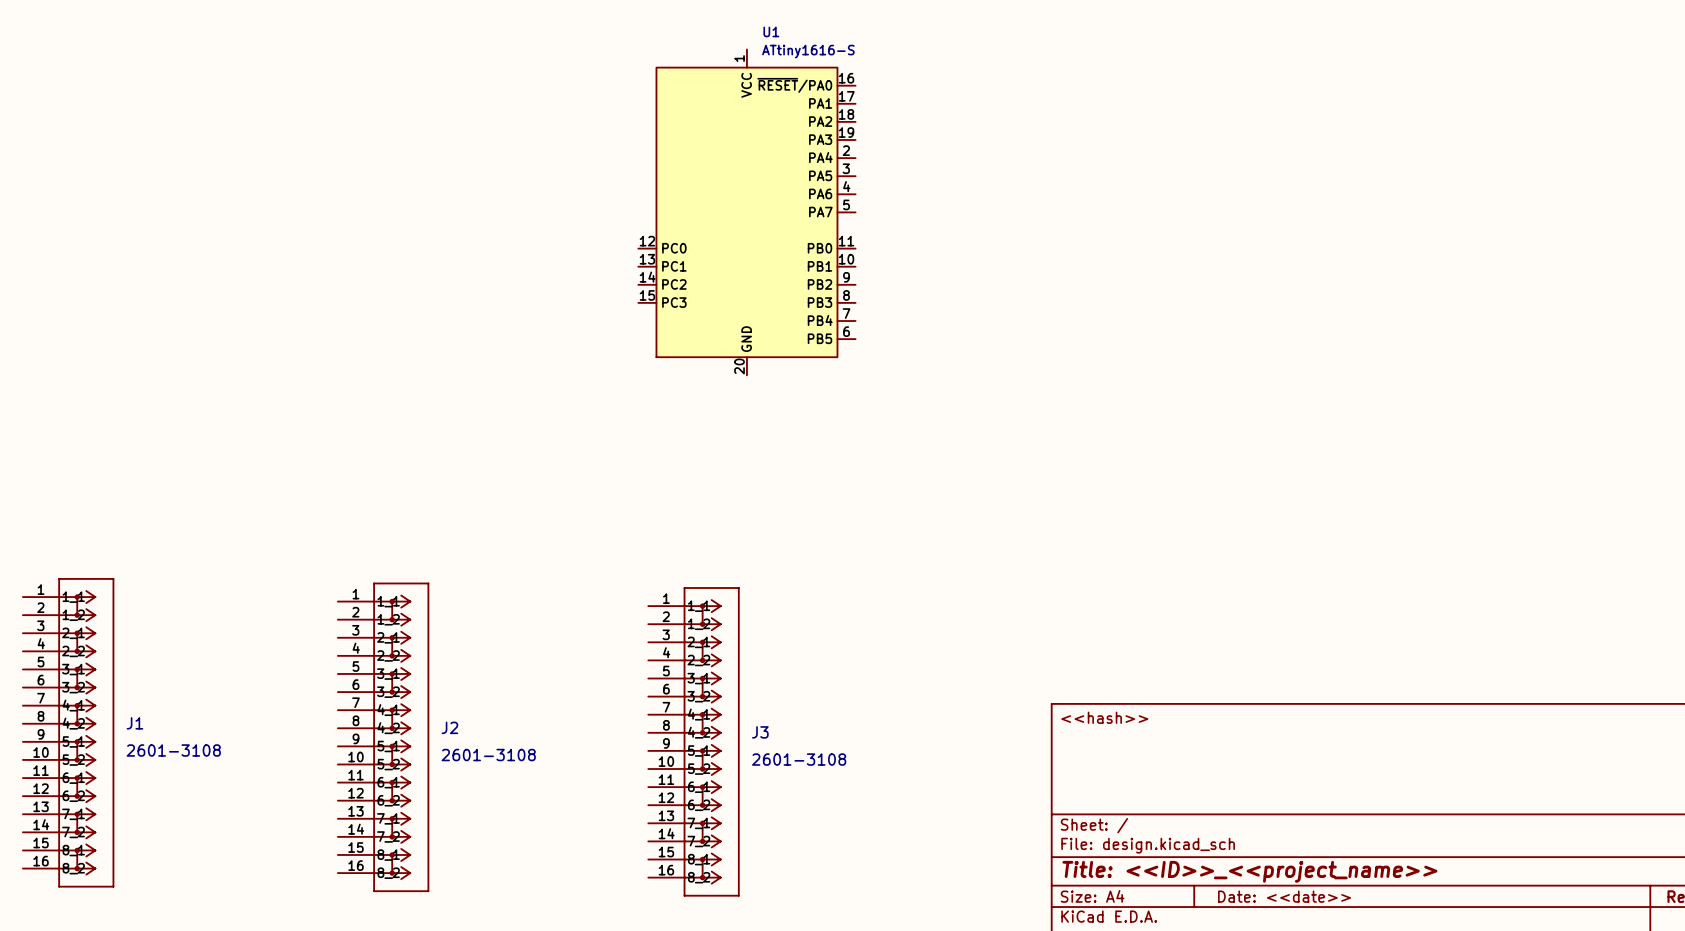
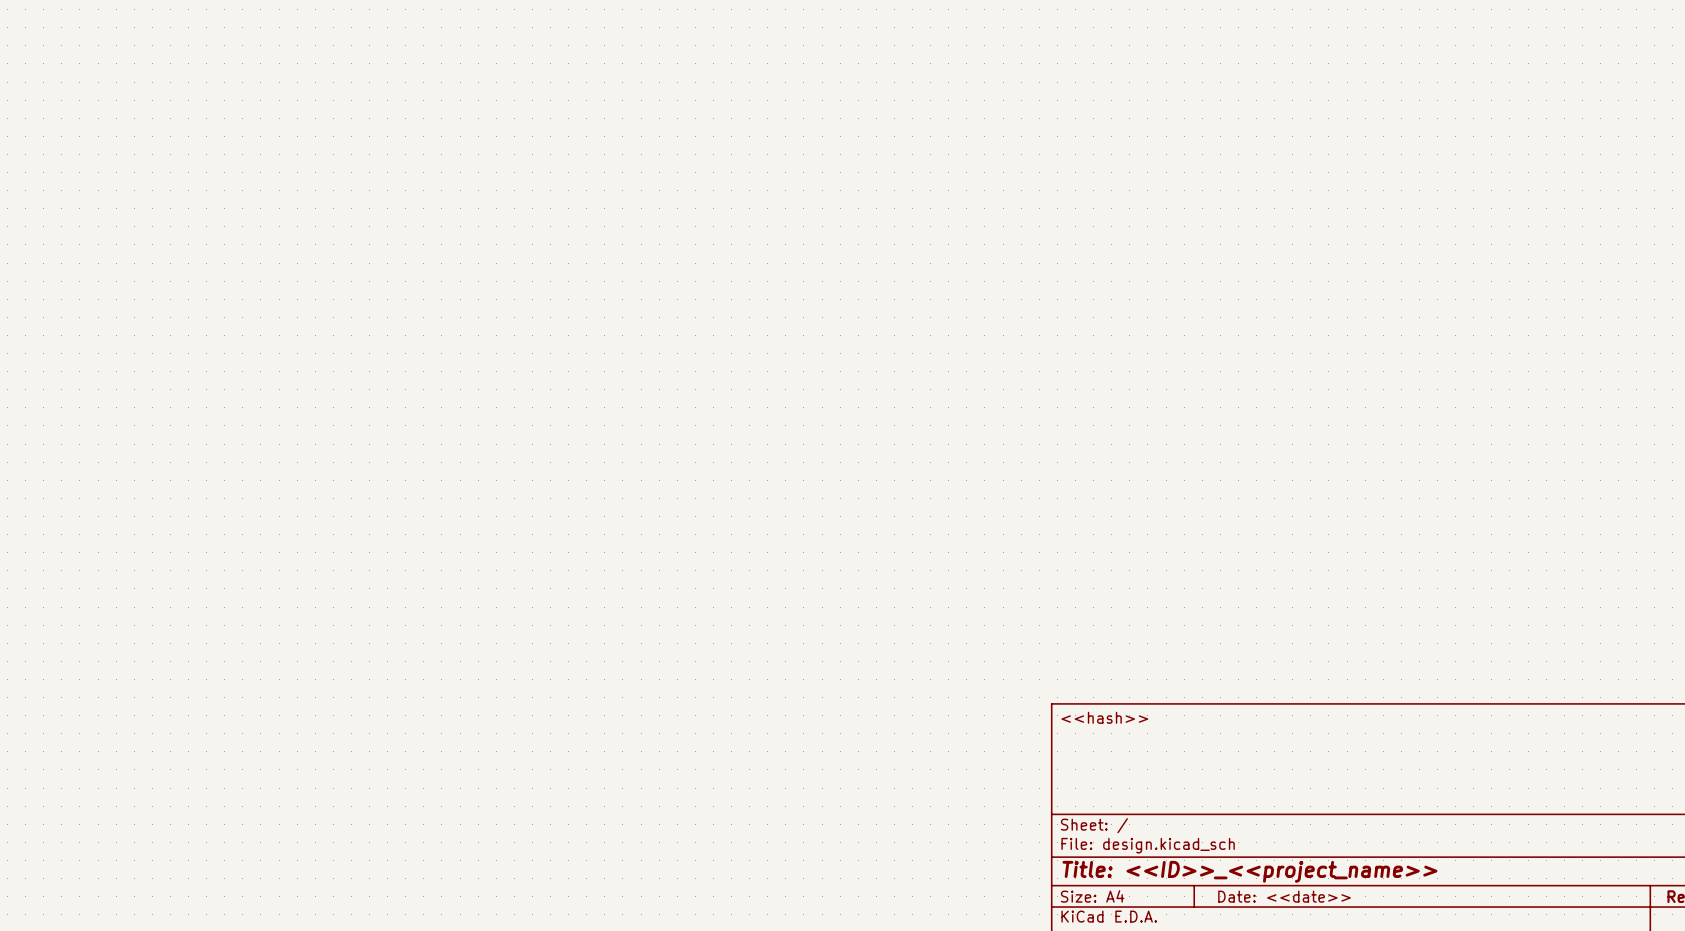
U1: ATtiny1616-S (746, 212) -> none
J1: 2601-3108 (68, 732) -> none
J2: 2601-3108 (383, 737) -> none
J3: 2601-3108 (693, 741) -> none

